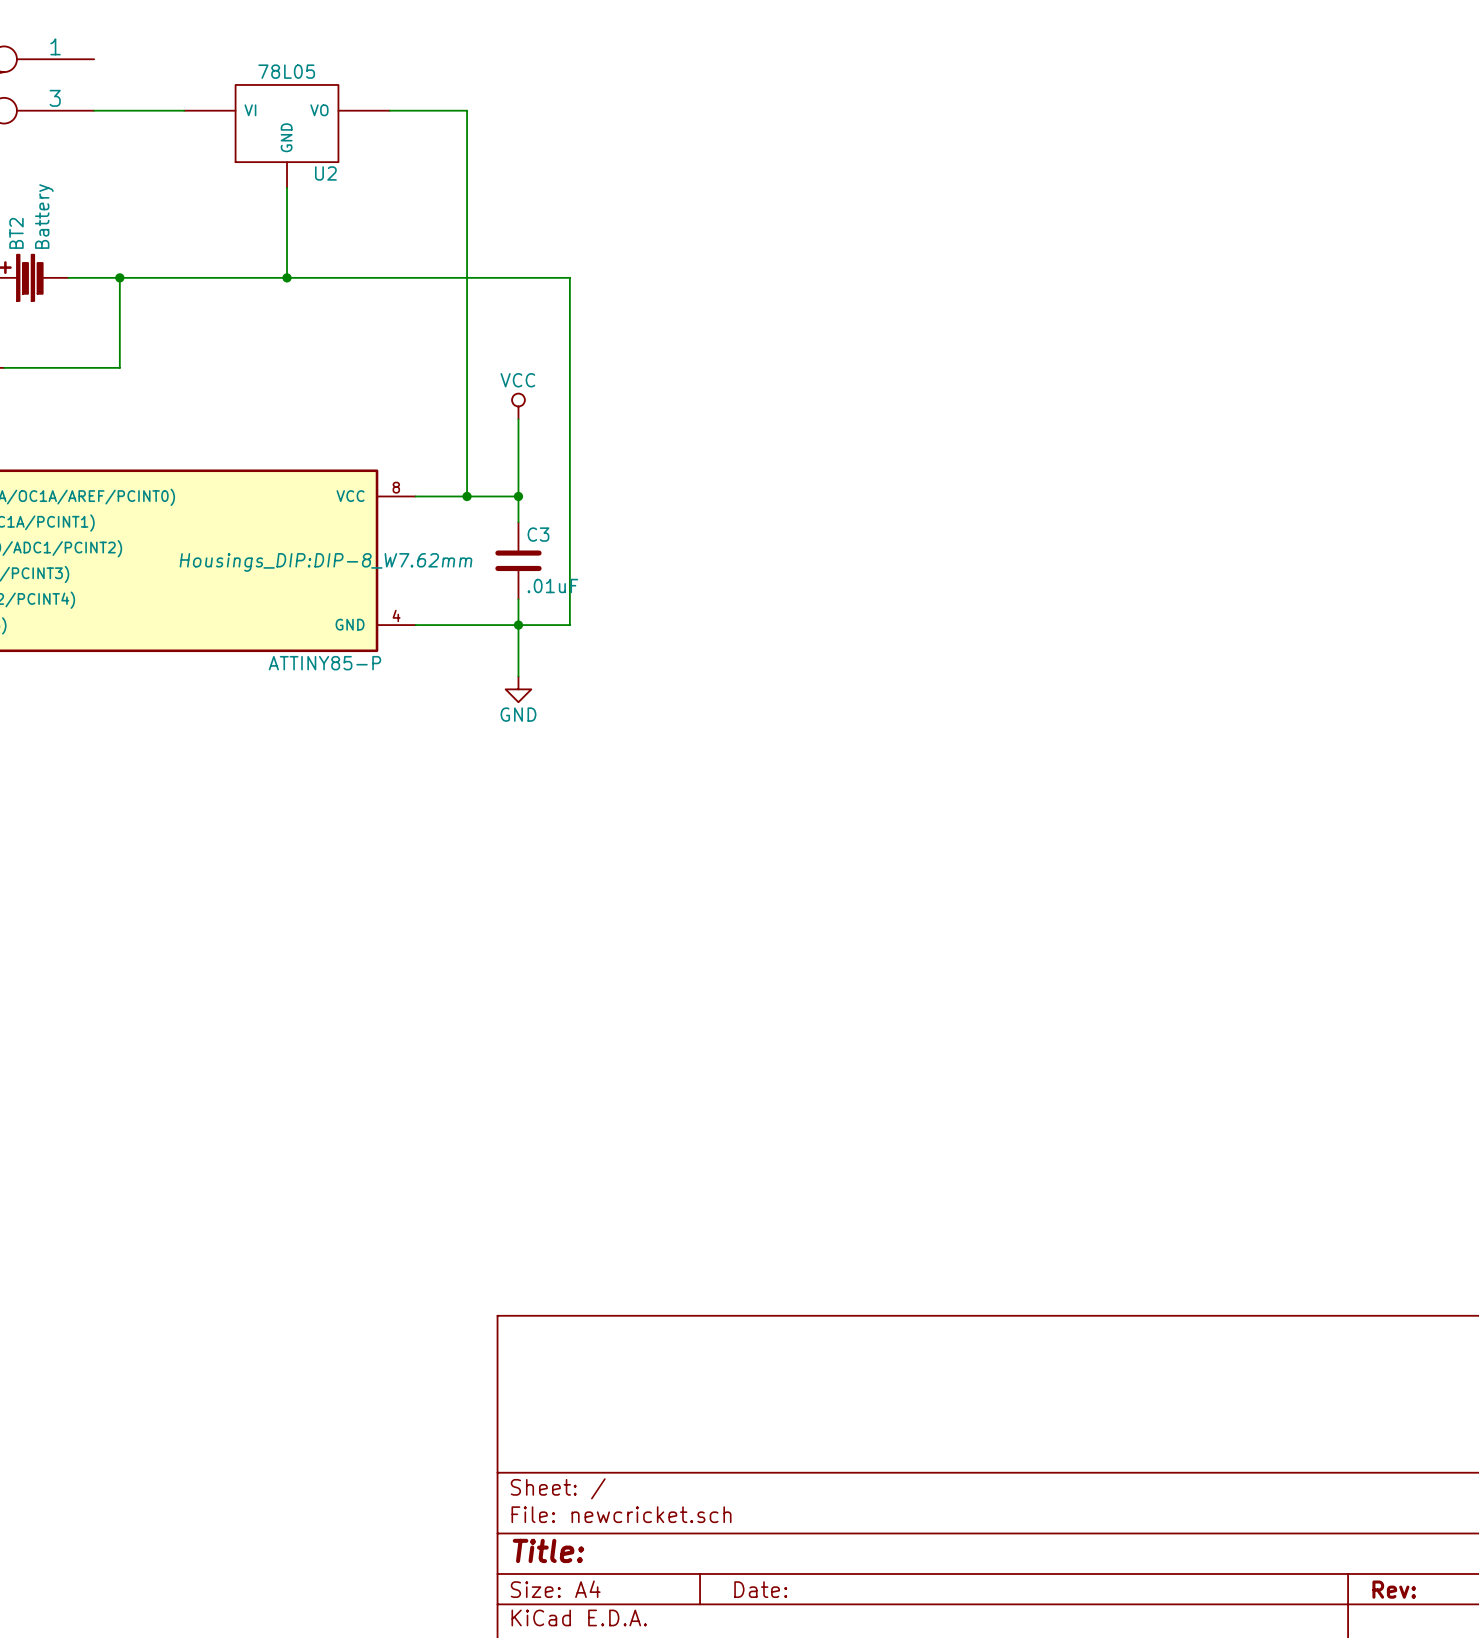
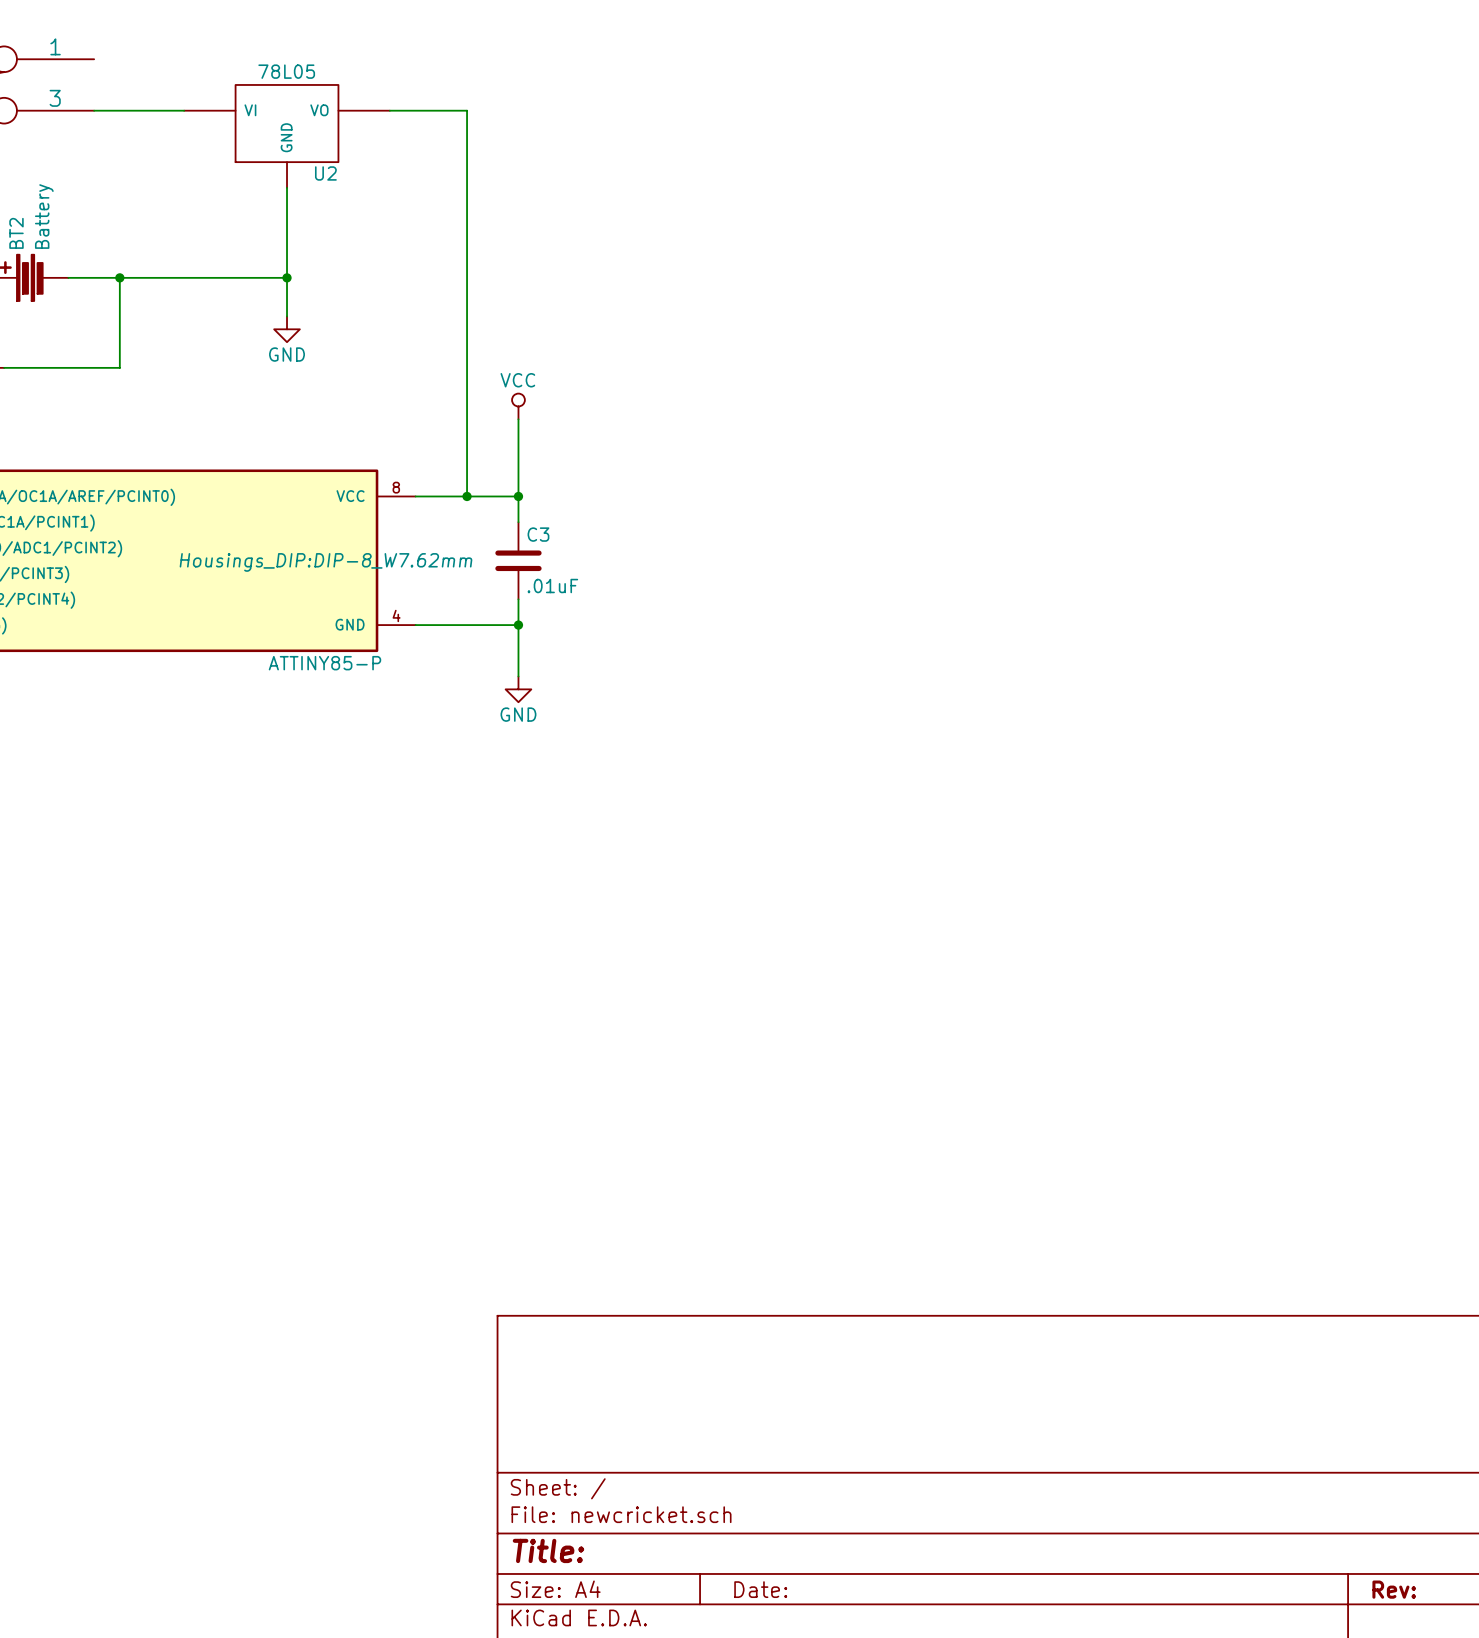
wire: (287, 277) (569, 277) (569, 625) (518, 625) -> (287, 277) (287, 316)
power symbol: none -> GND (287, 329)

